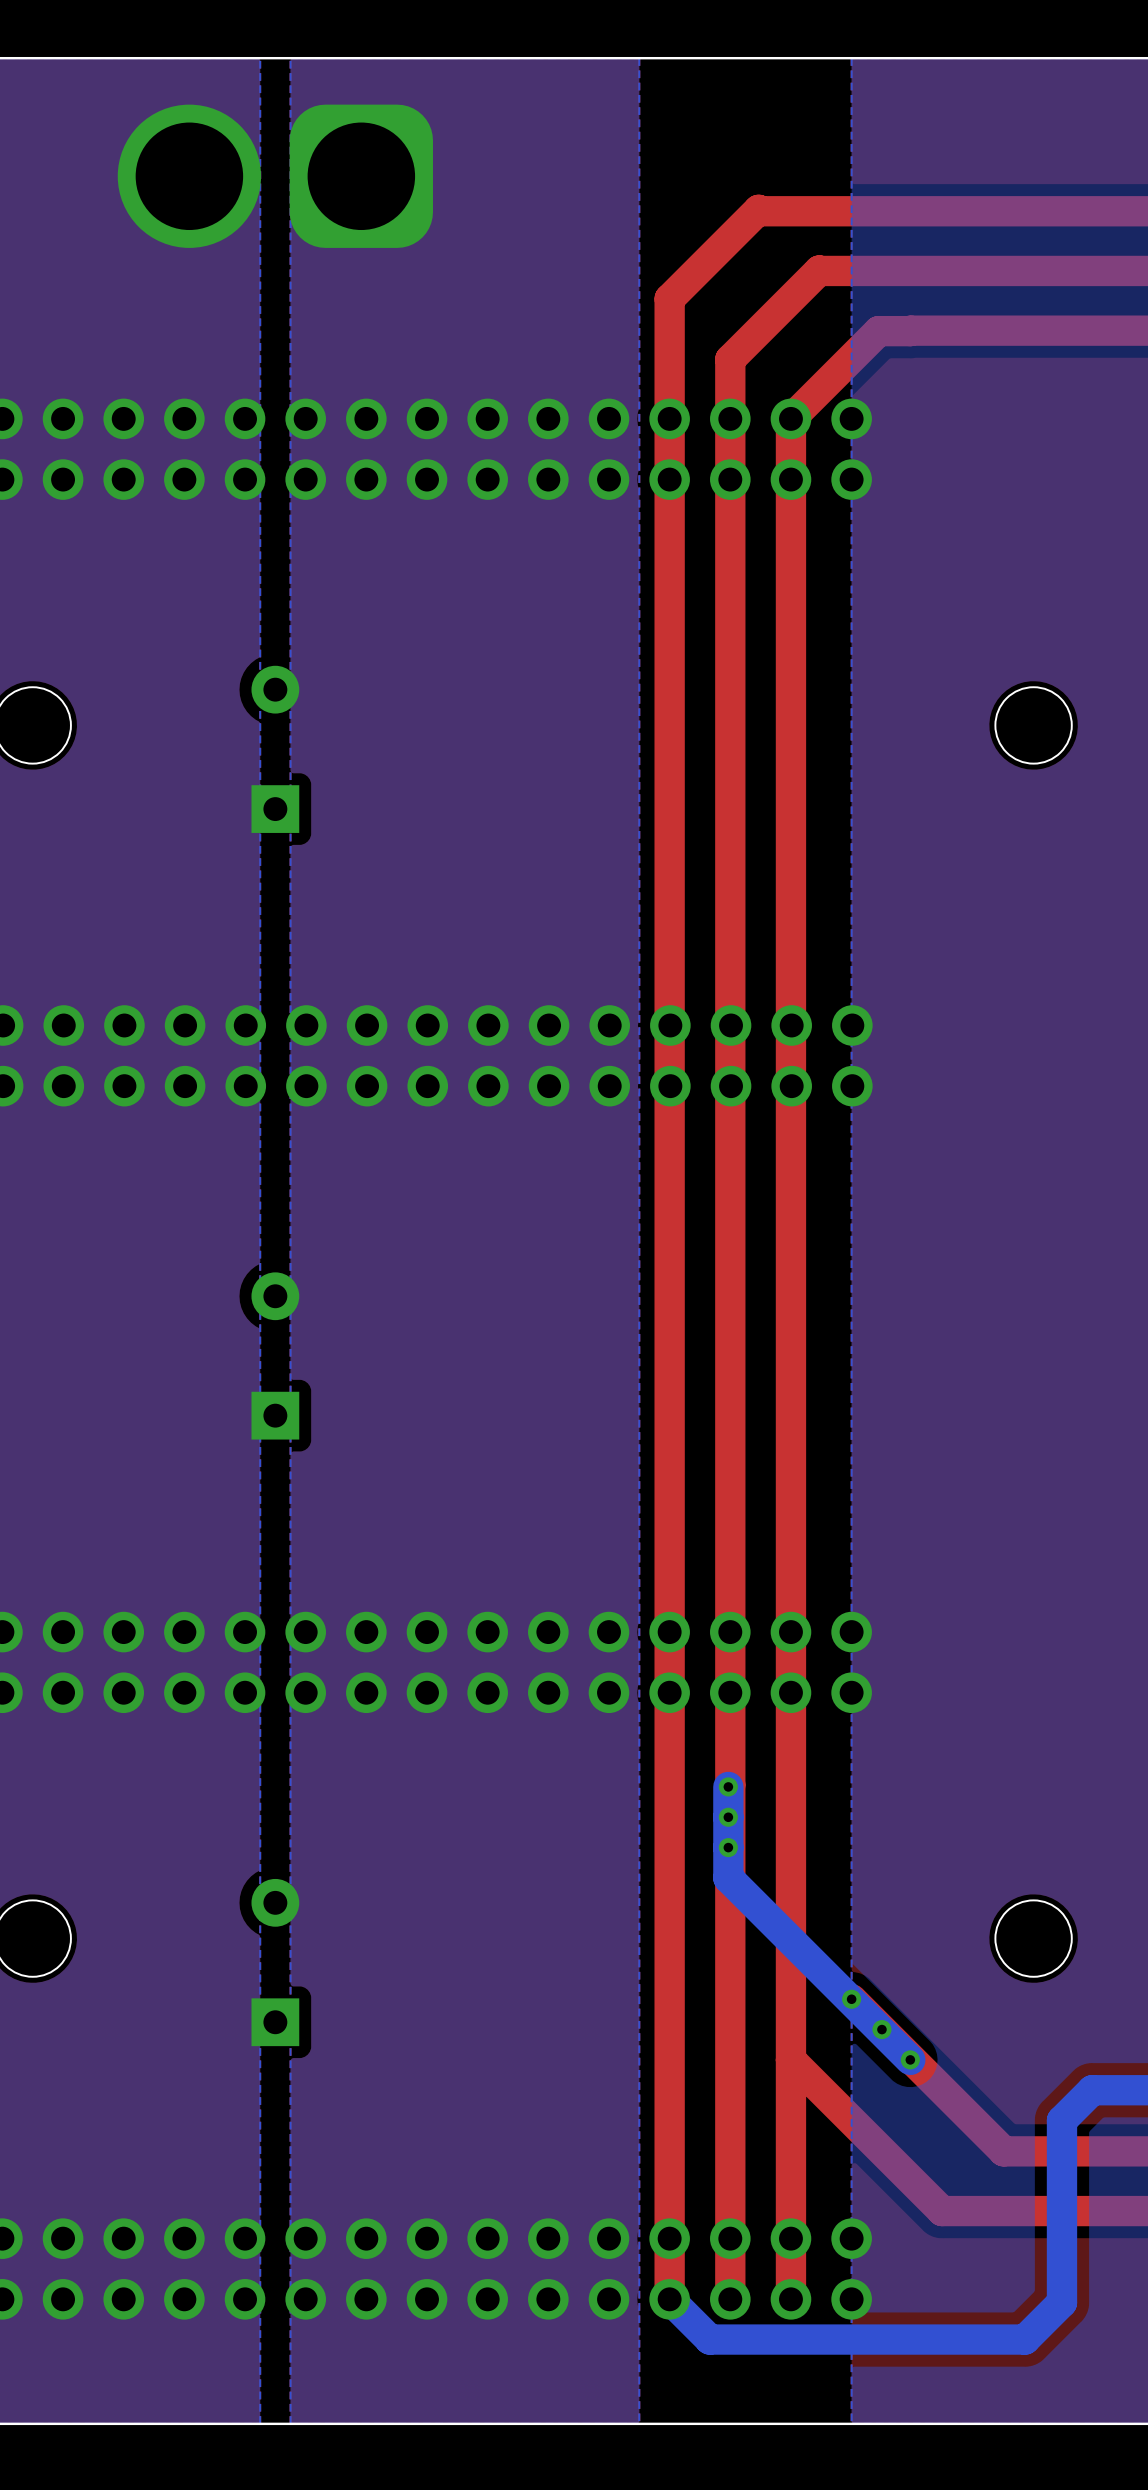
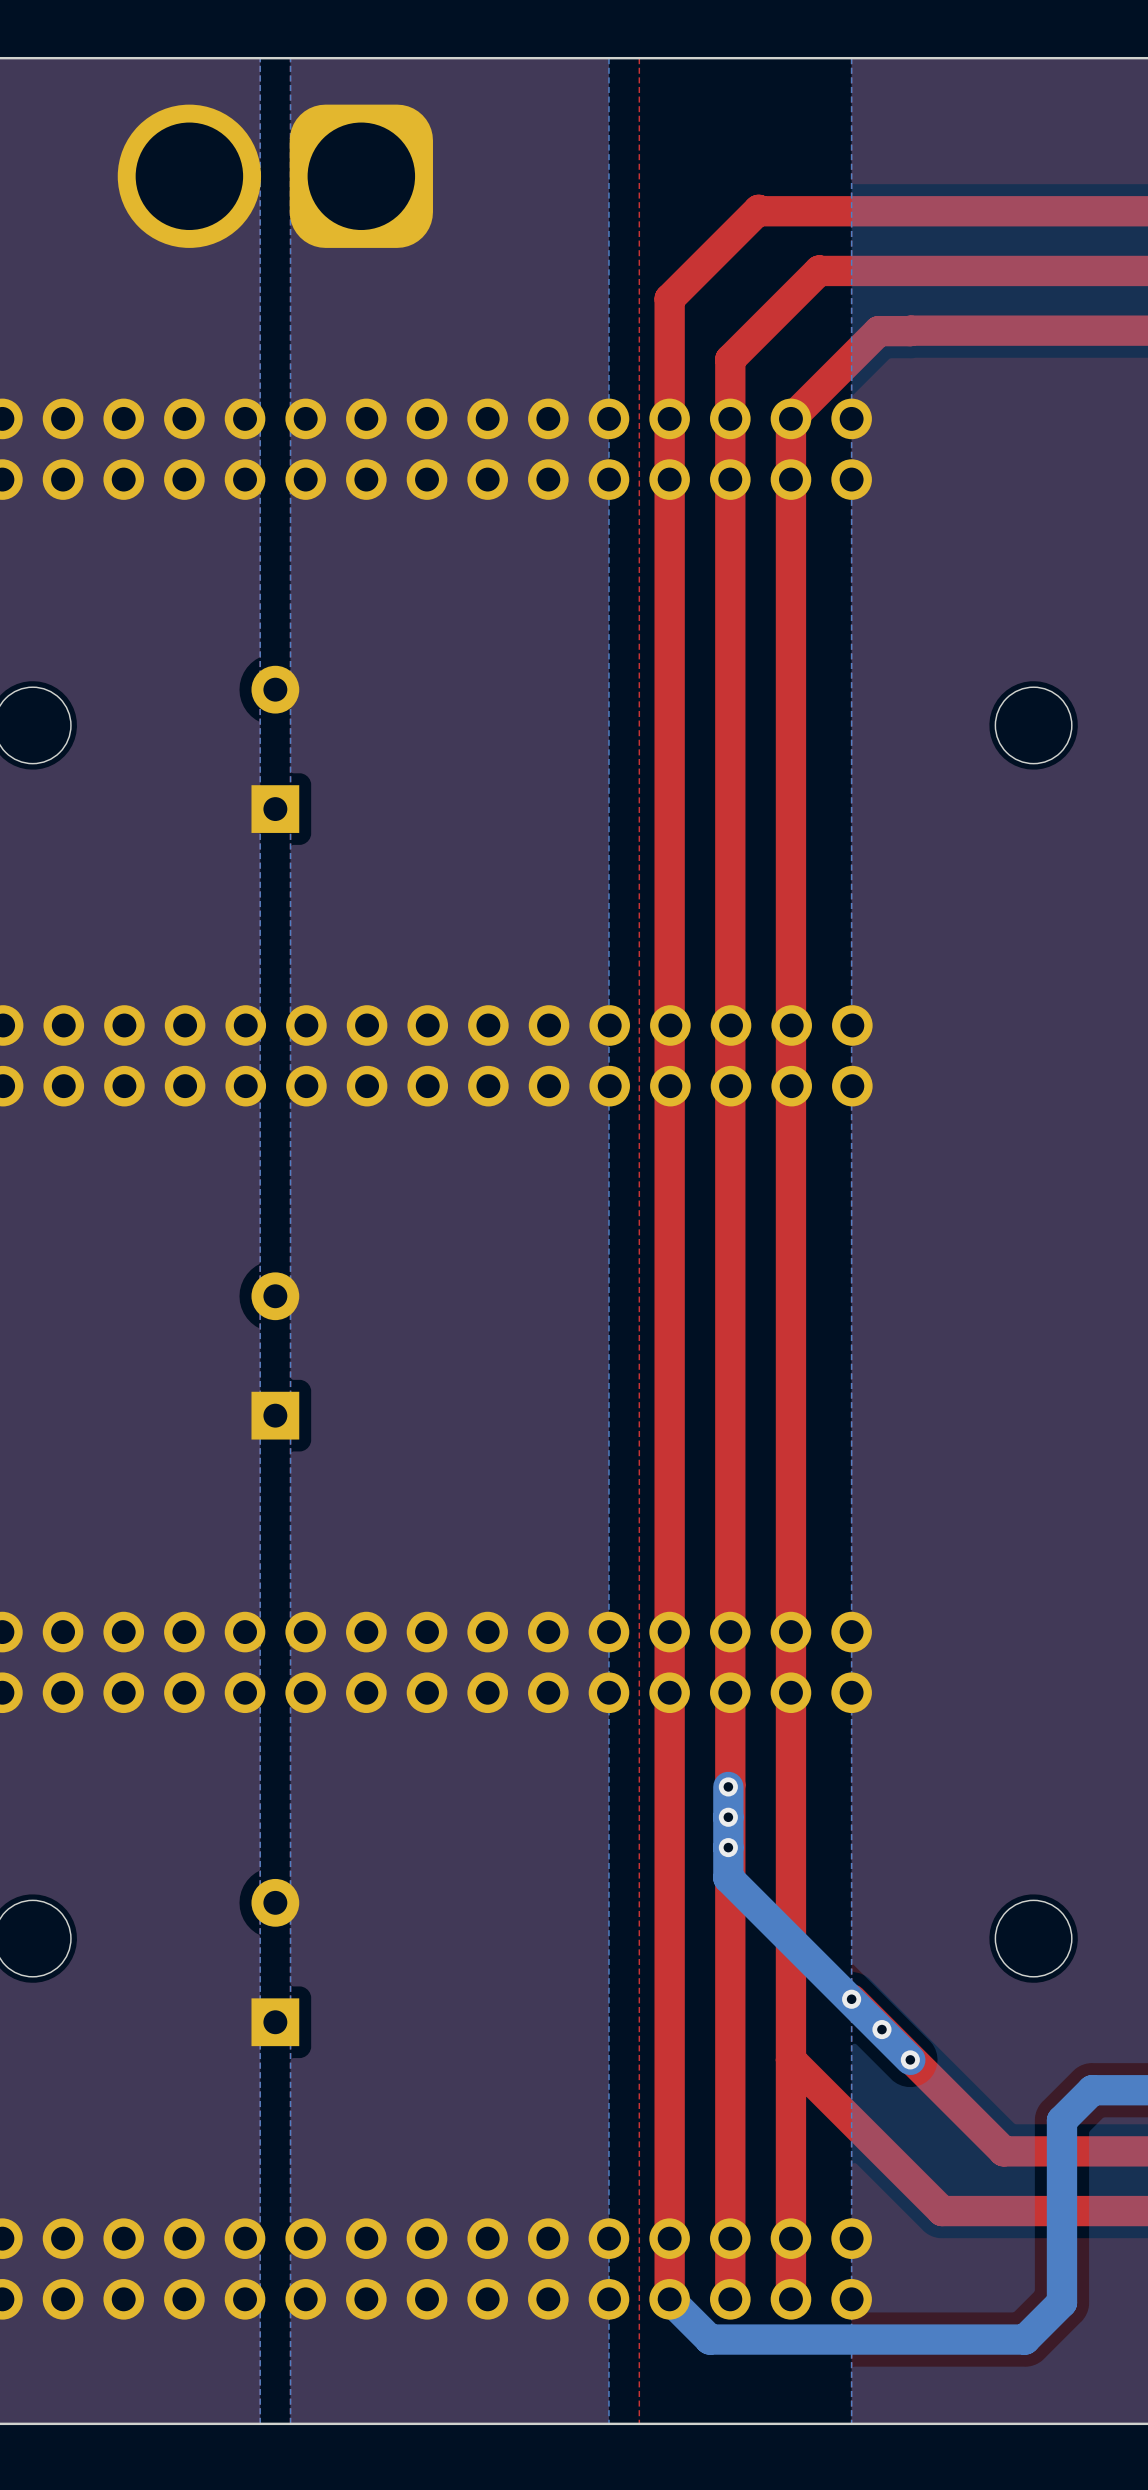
bottom zone outline: (608, 58) (639, 58) (639, 2423) (608, 2423) -> (608, 58) (608, 2423)

